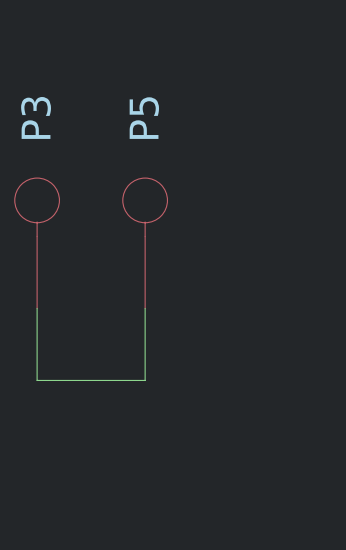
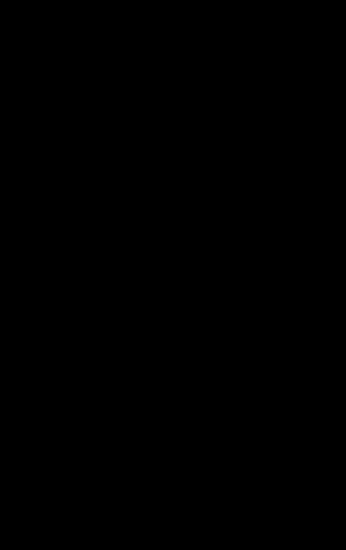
P3: (37, 243) -> none
P5: (145, 243) -> none
wire: (37, 308) (37, 380) (145, 380) (145, 308) -> none

